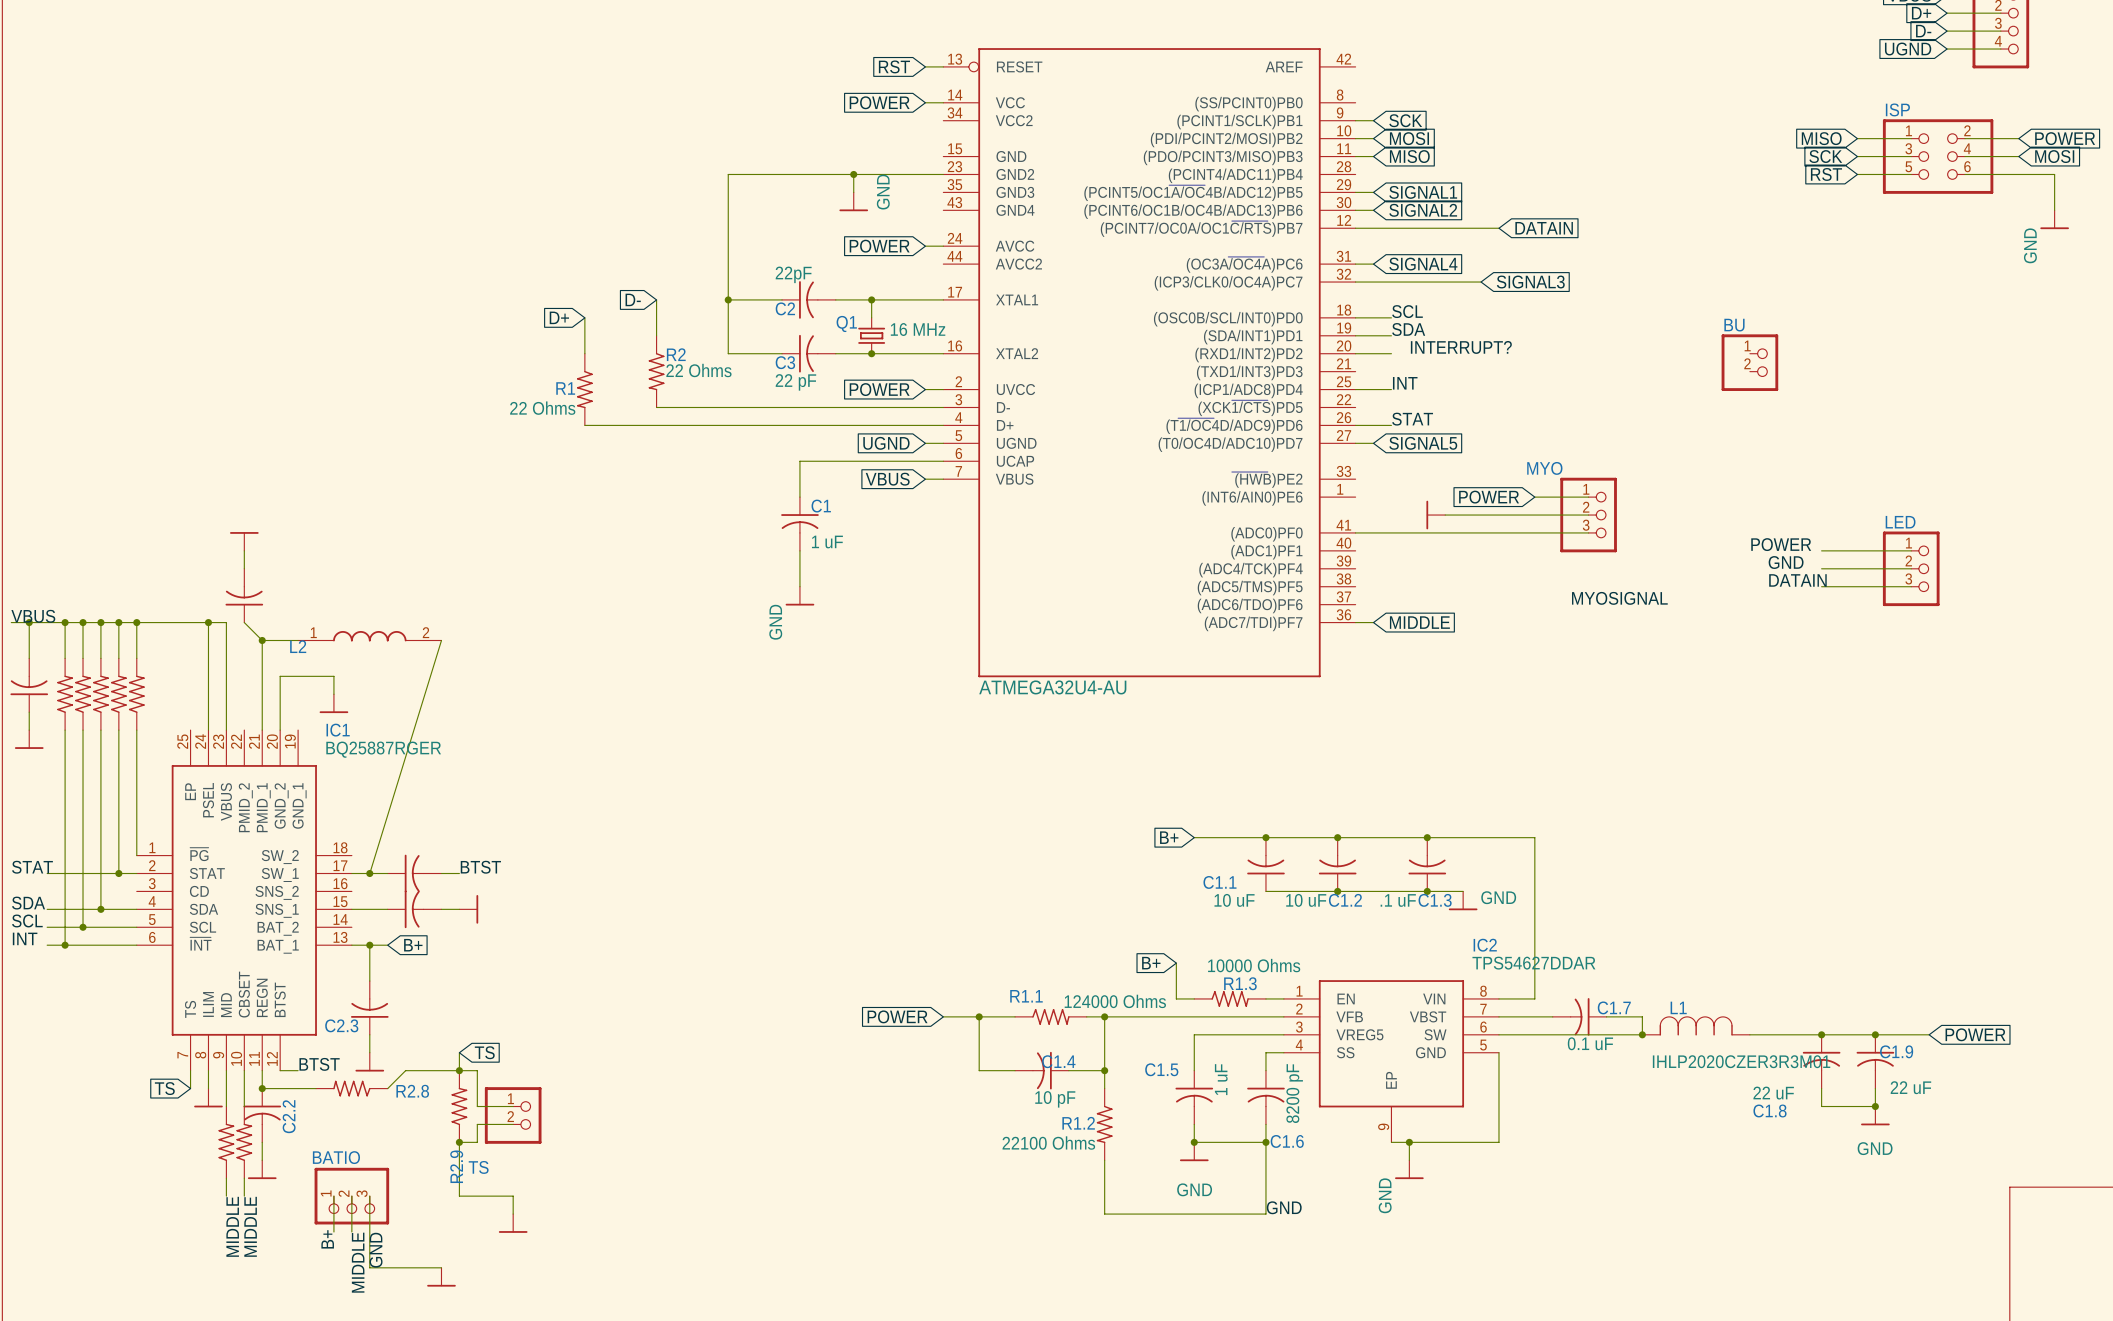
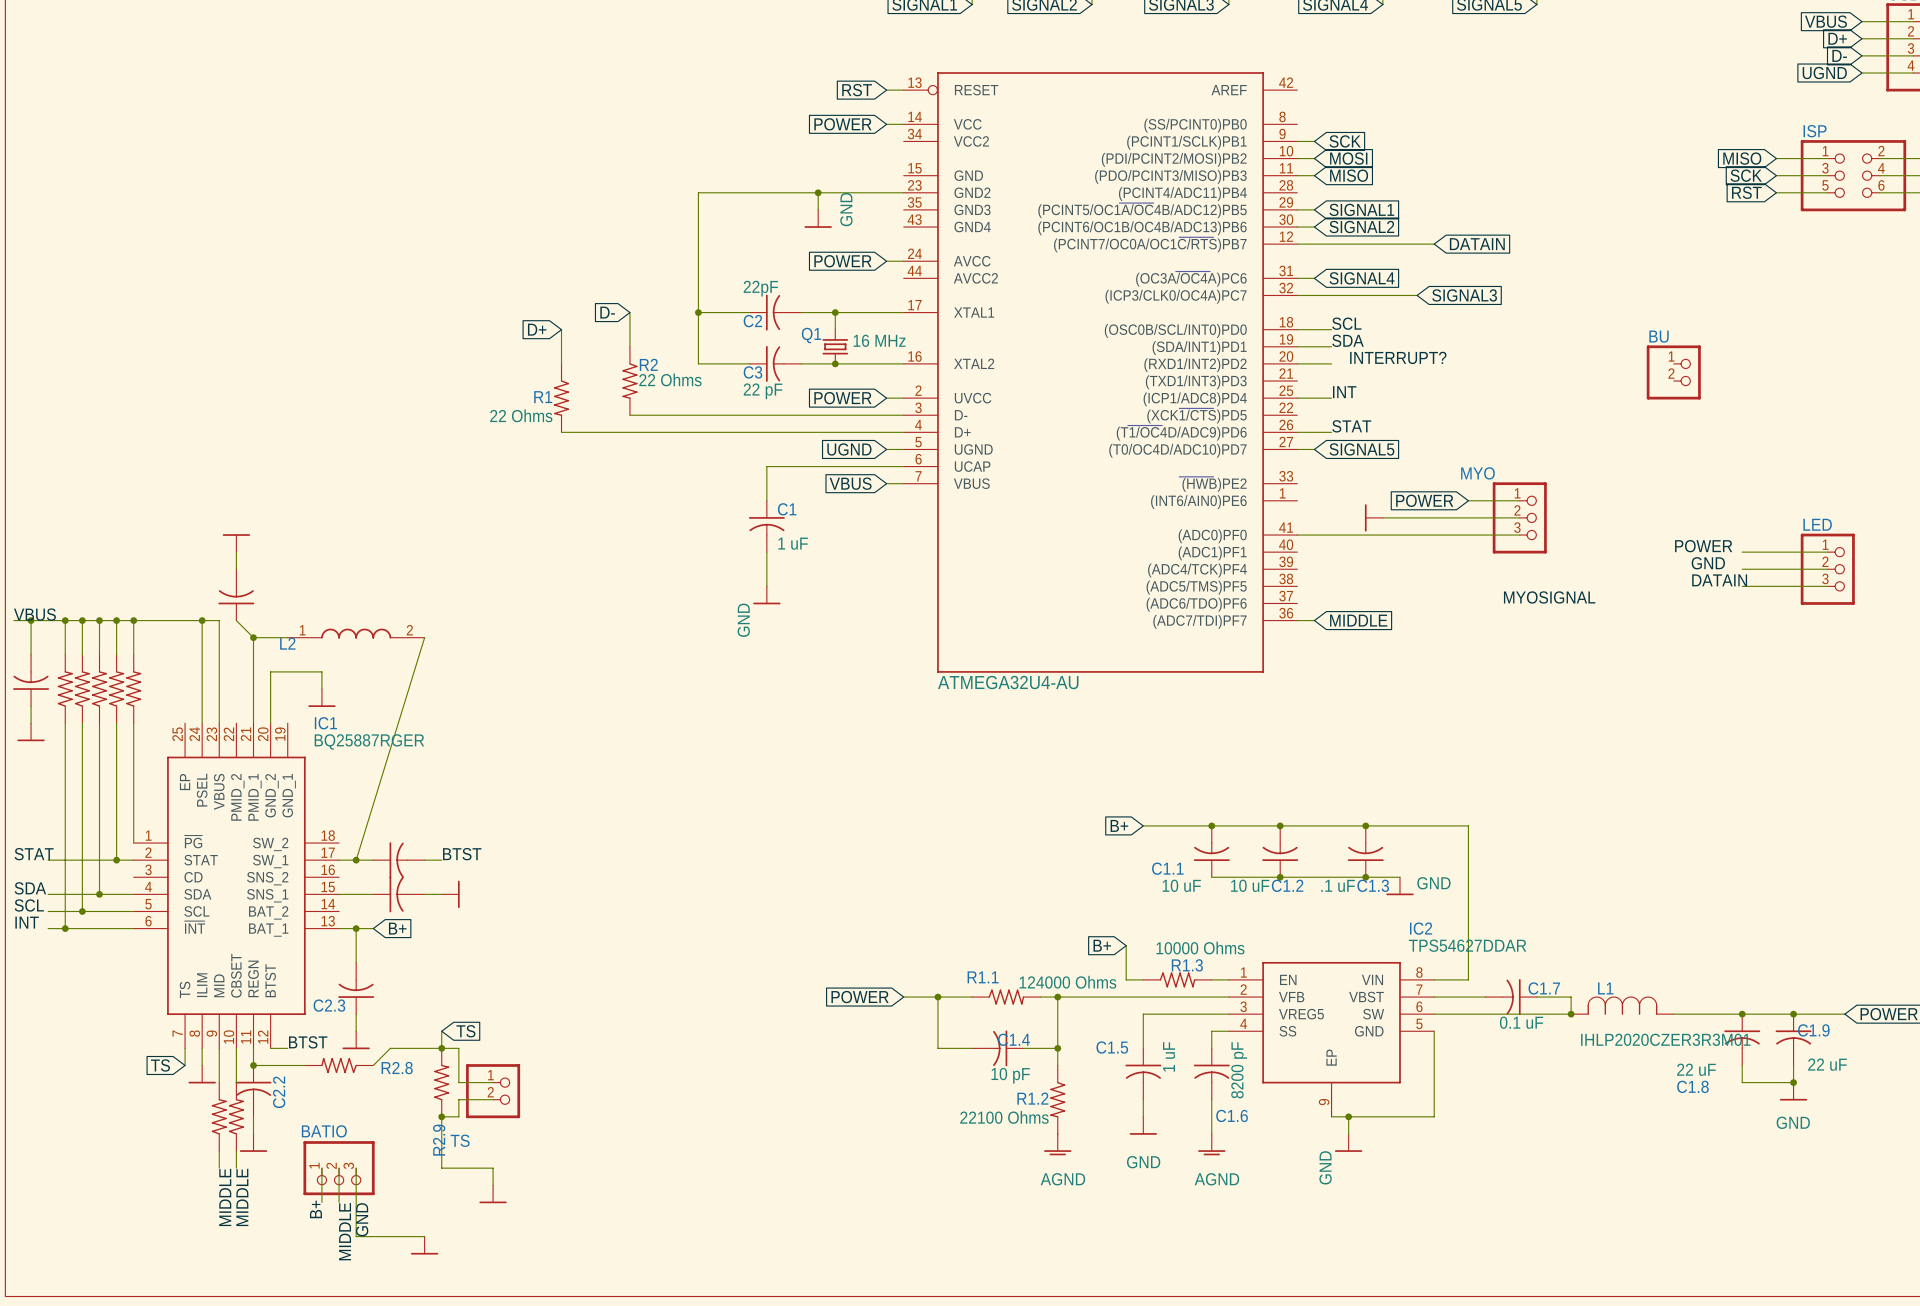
wire: (1194, 1142) (1265, 1142) -> none
junction: (1194, 1142) -> none
junction: (1265, 1142) -> none
wire: (1104, 1160) (1104, 1214) (1265, 1214) (1265, 1160) -> none
power symbol: none -> AGND (1057, 1144)
power symbol: none -> AGND (1211, 1144)
label: GND (1284, 1207) -> none

